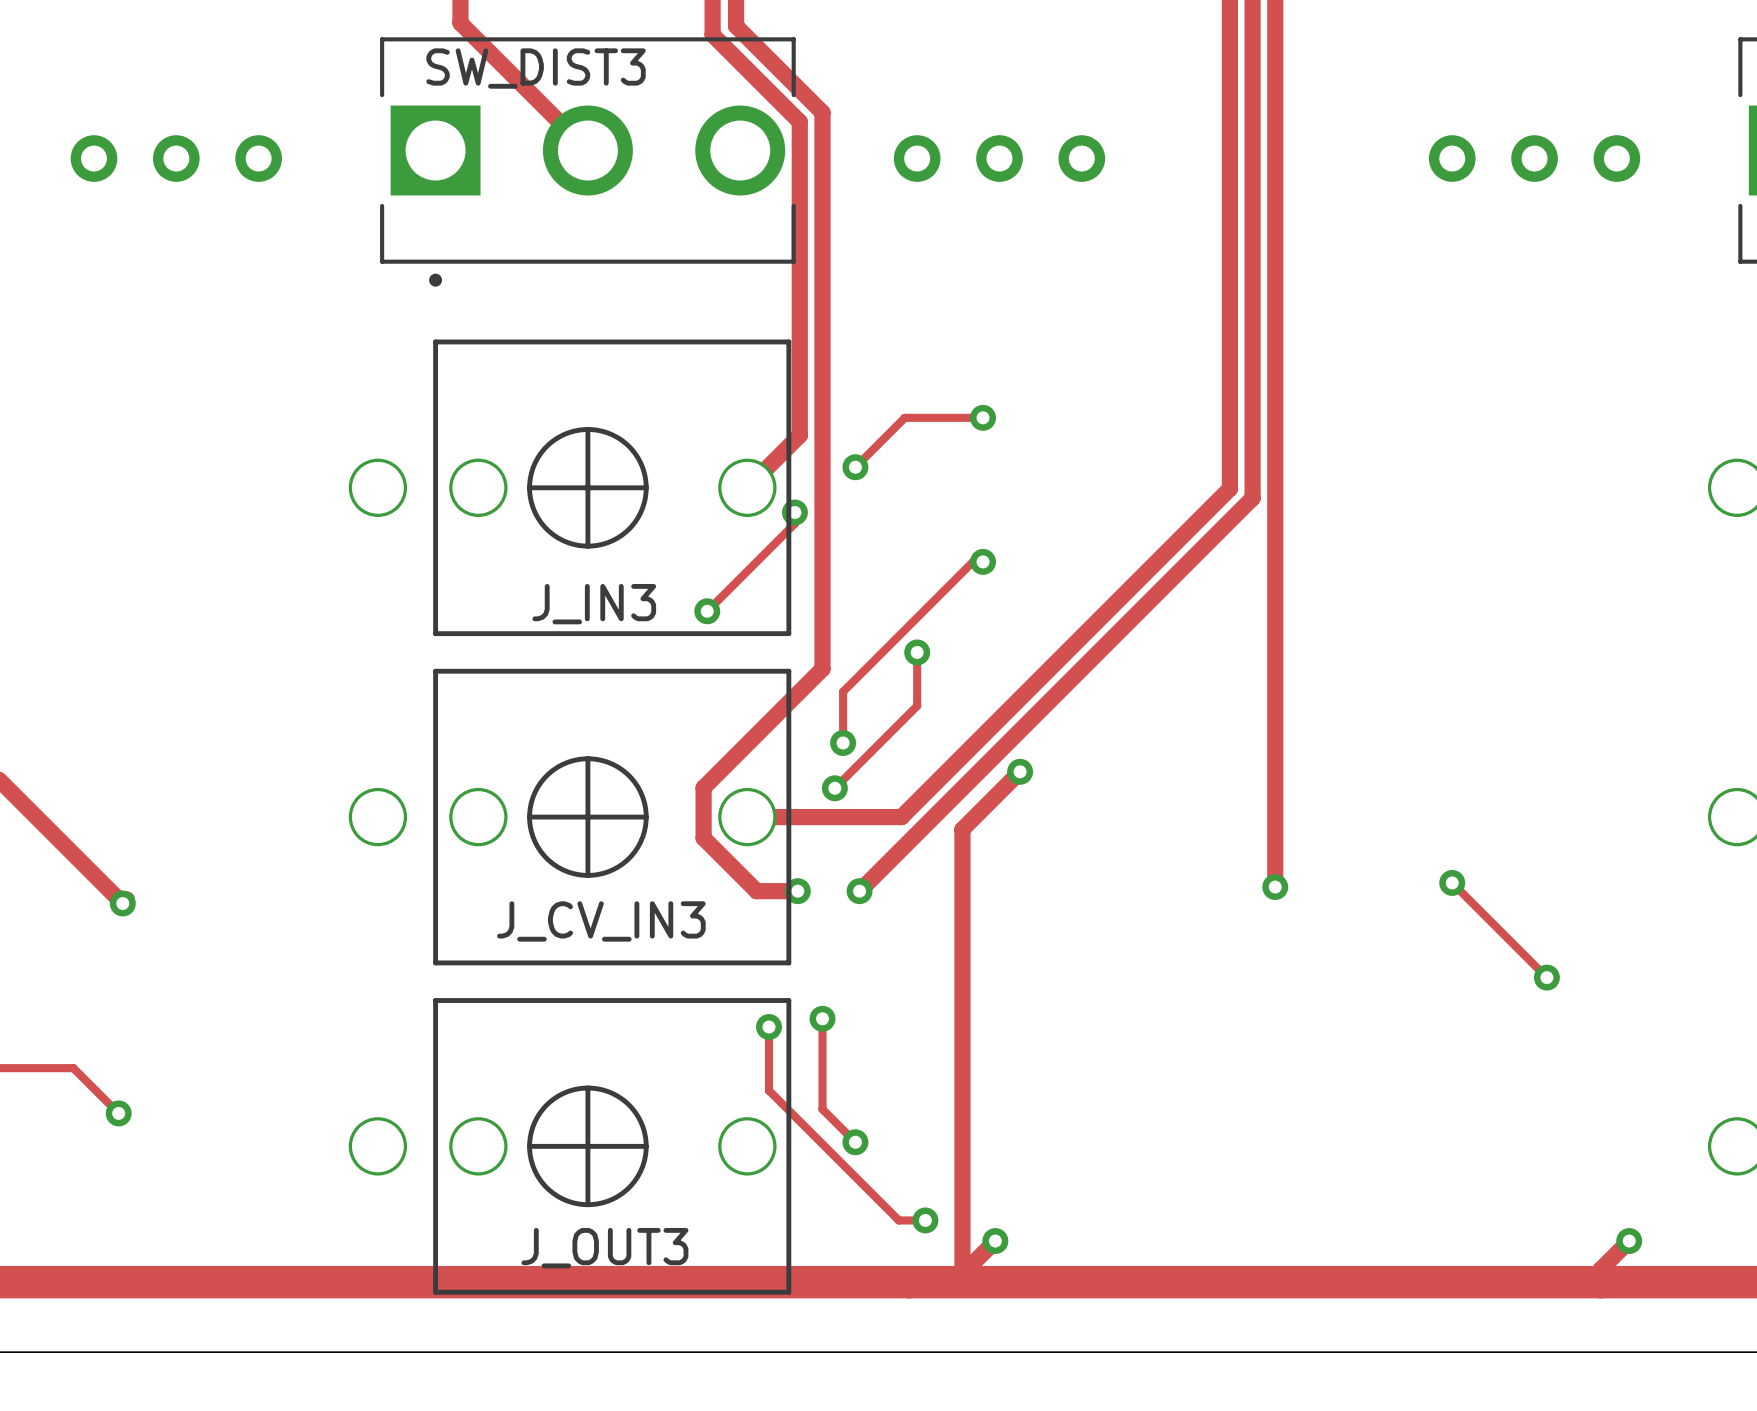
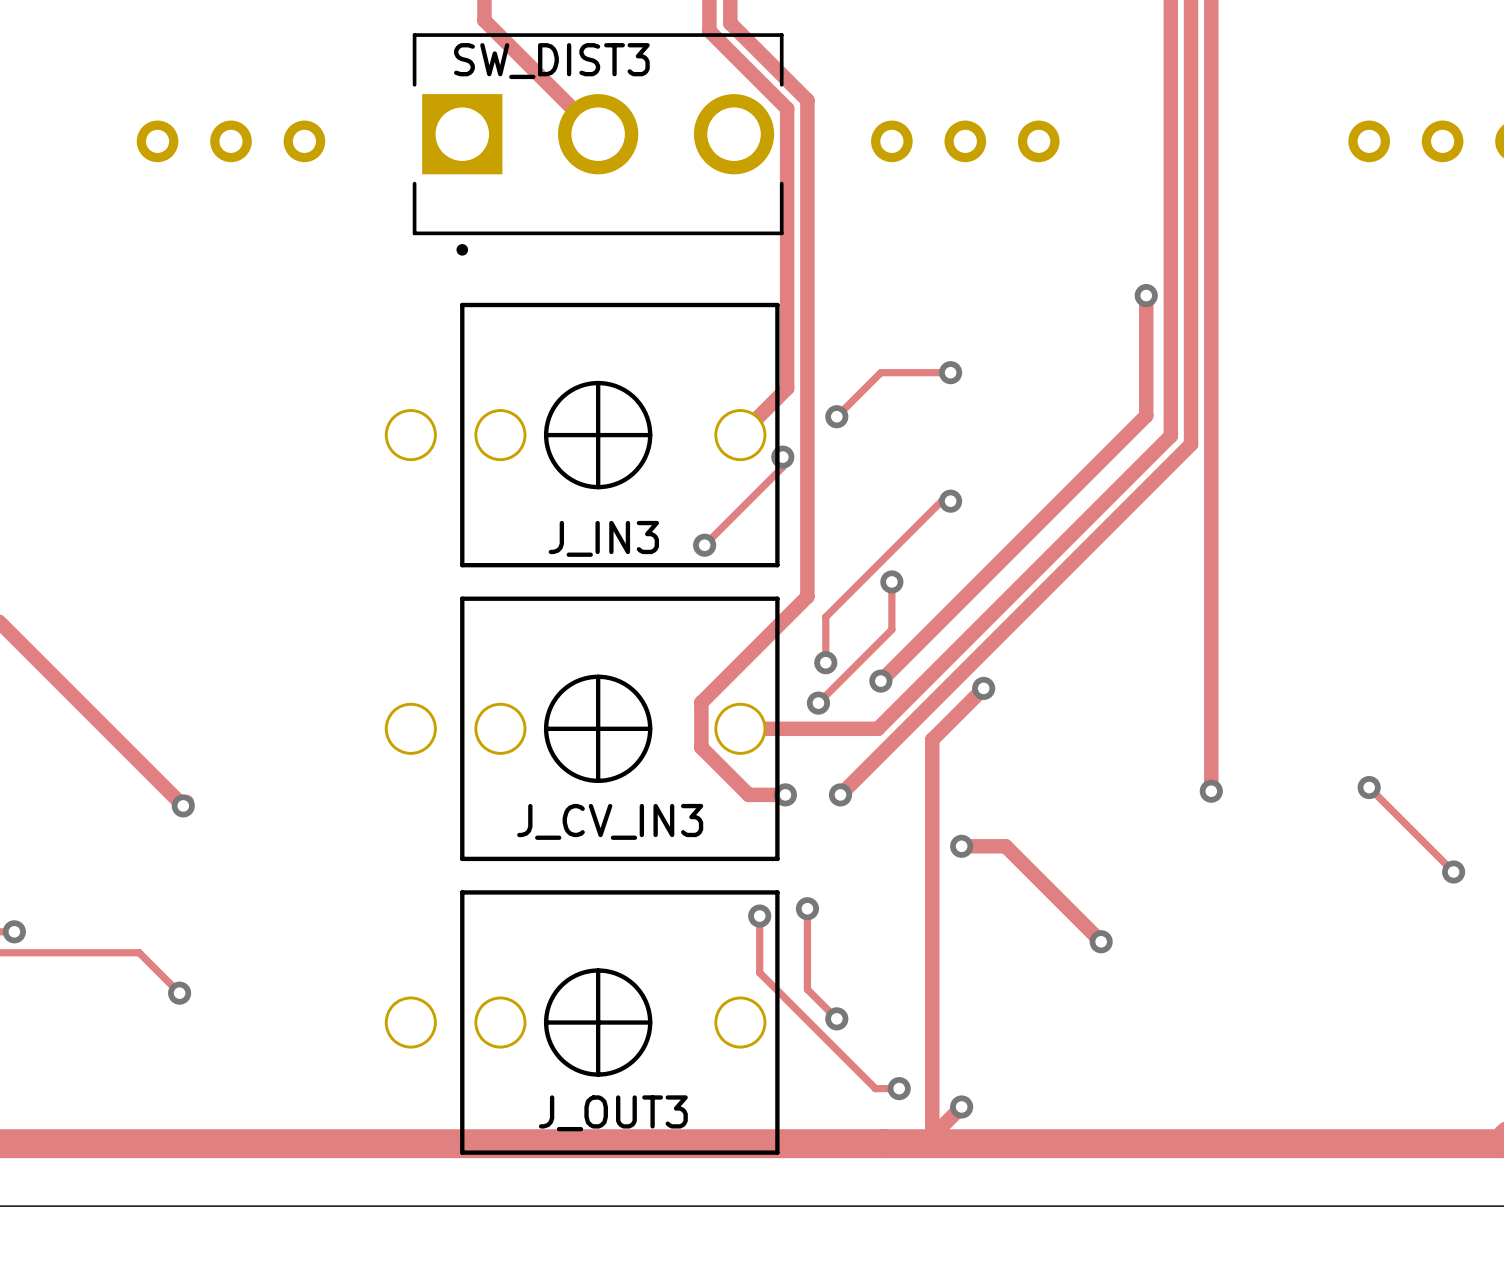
track: none -> (1146, 295) (1146, 415) (880, 681)
via: none -> (1146, 295)
via: none -> (880, 681)
track: none -> (961, 846) (1005, 846) (1101, 941)
via: none -> (961, 846)
via: none -> (1101, 941)

